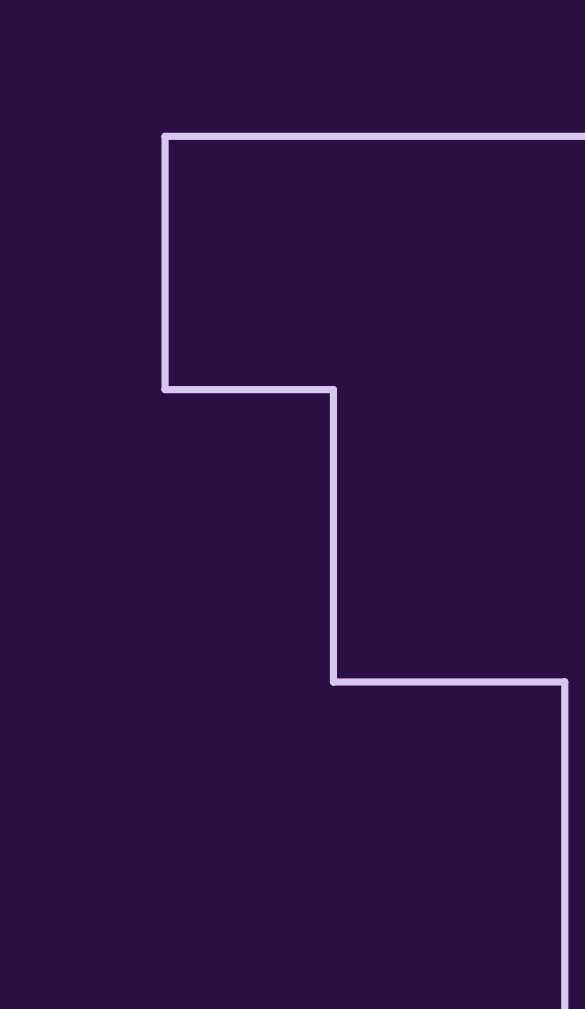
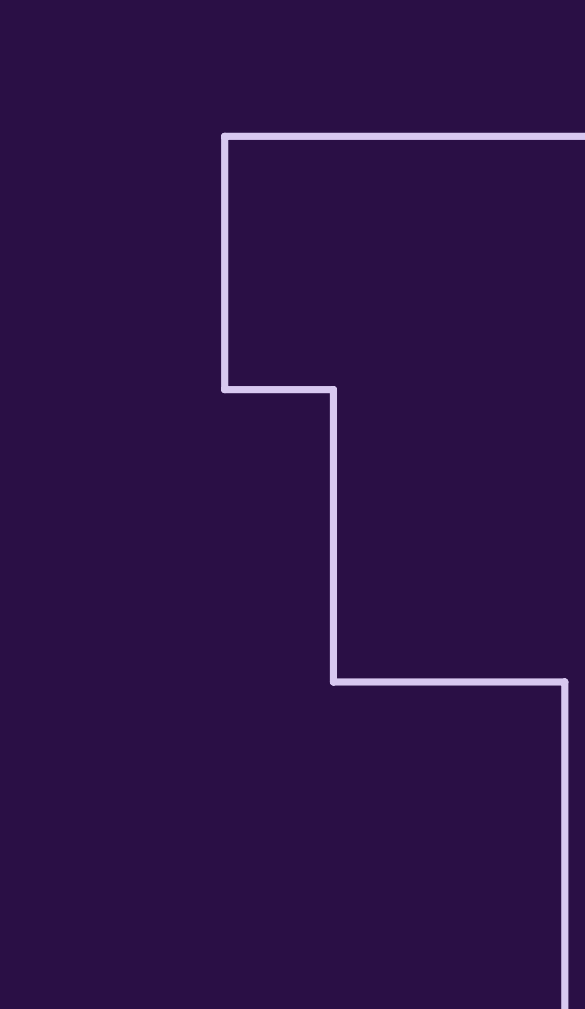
board edge: (224, 136) (165, 136) (165, 389) (224, 389) -> (224, 136) (224, 389)

